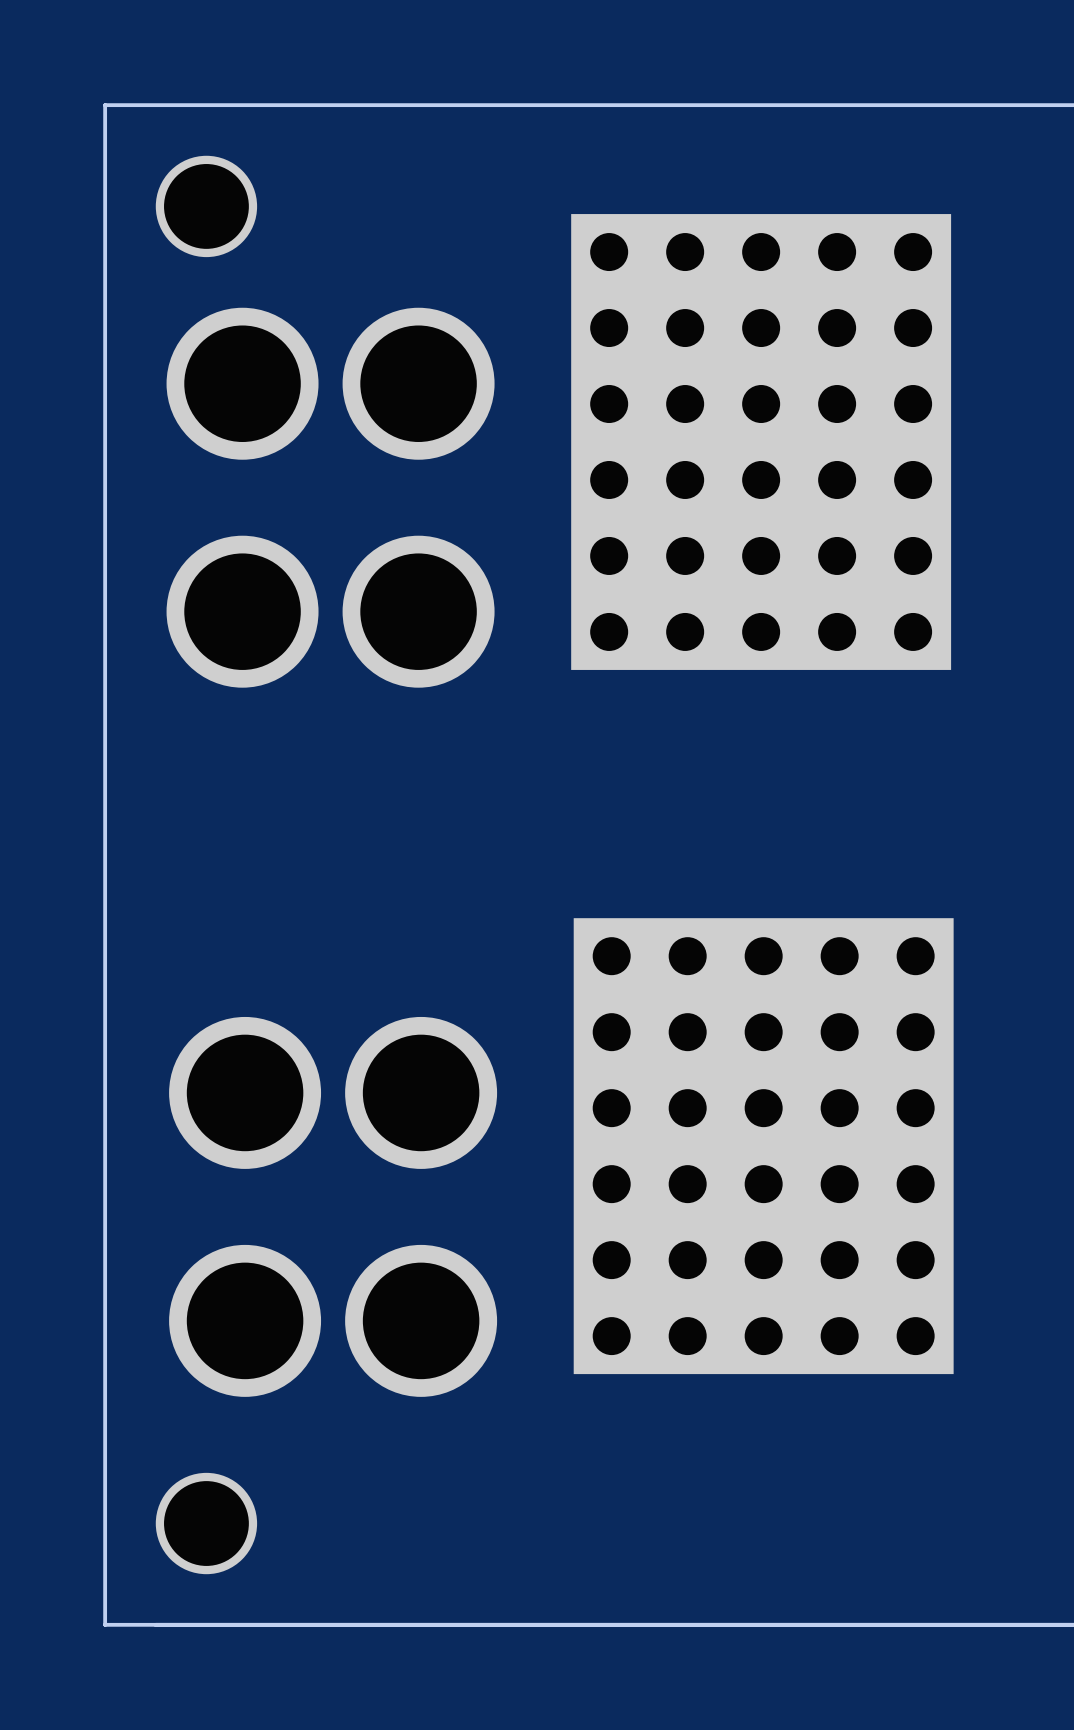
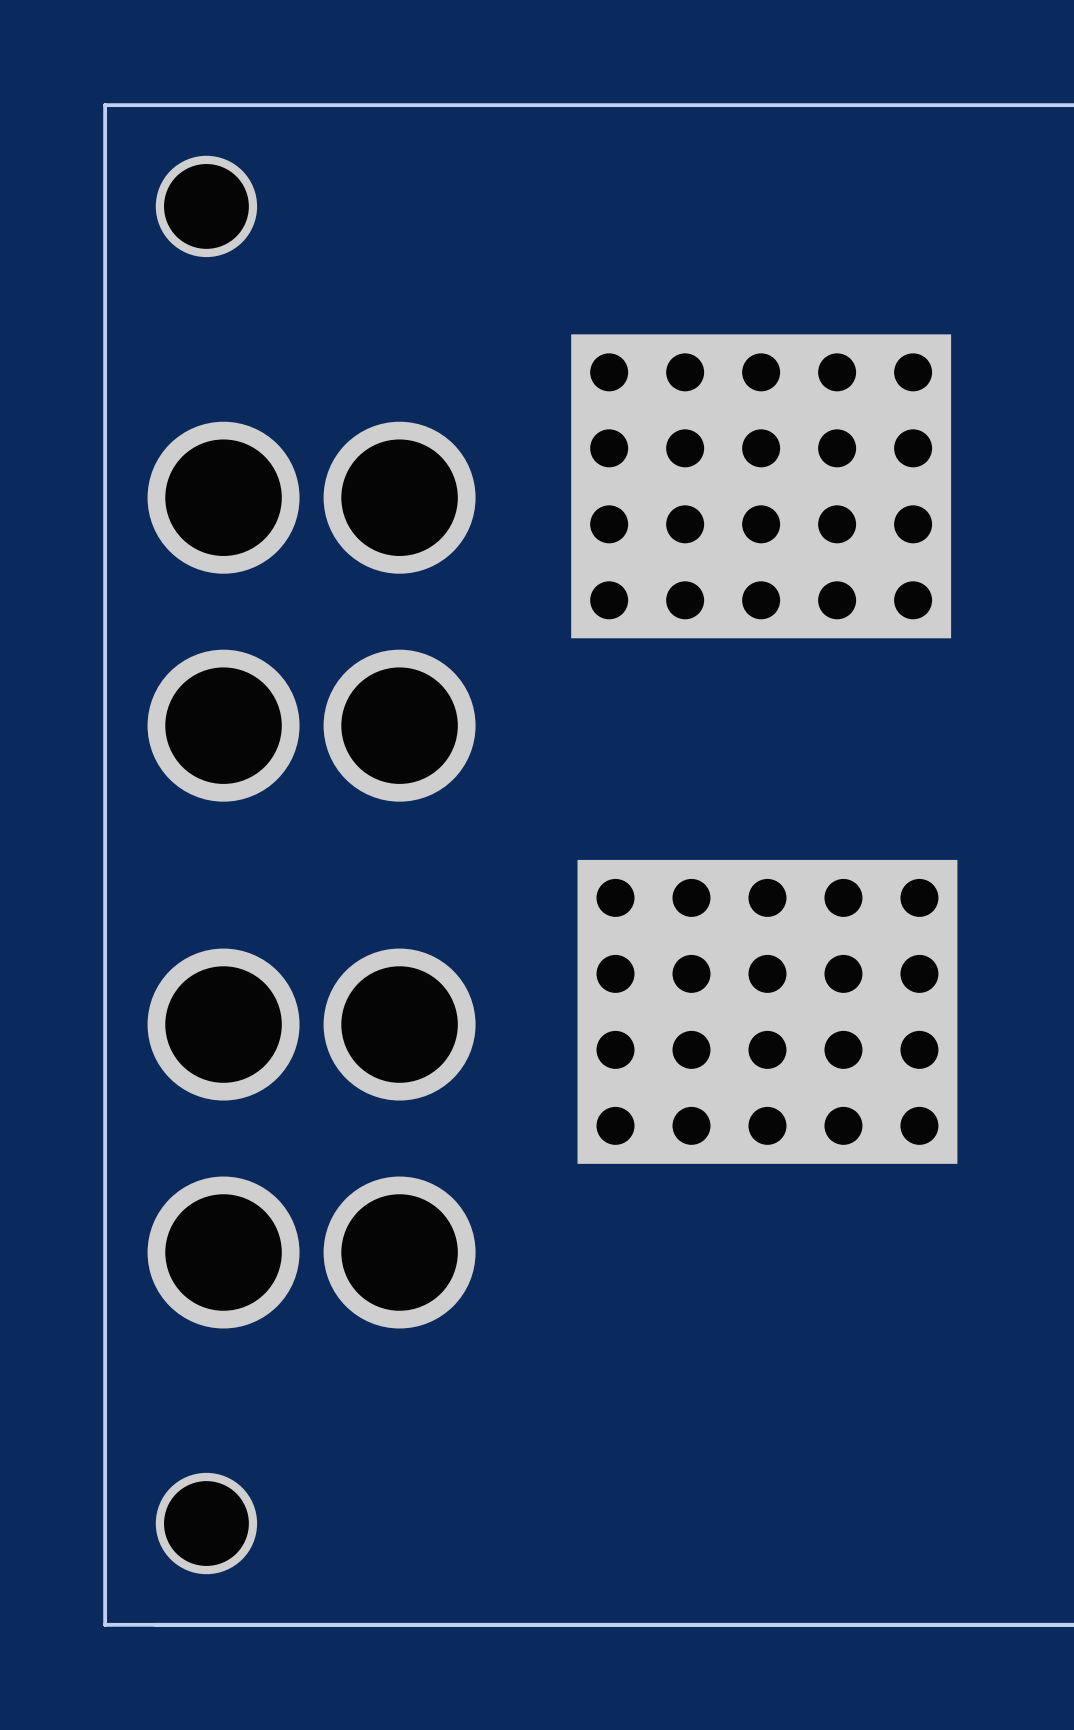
part: (330, 383) -> none
part: (761, 442) -> none
part: none -> (761, 486)
part: none -> (311, 497)
part: (330, 611) -> none
part: none -> (311, 725)
part: none -> (767, 1011)
part position: (333, 1092) -> (311, 1024)
part: (763, 1146) -> none
part position: (333, 1320) -> (311, 1252)

